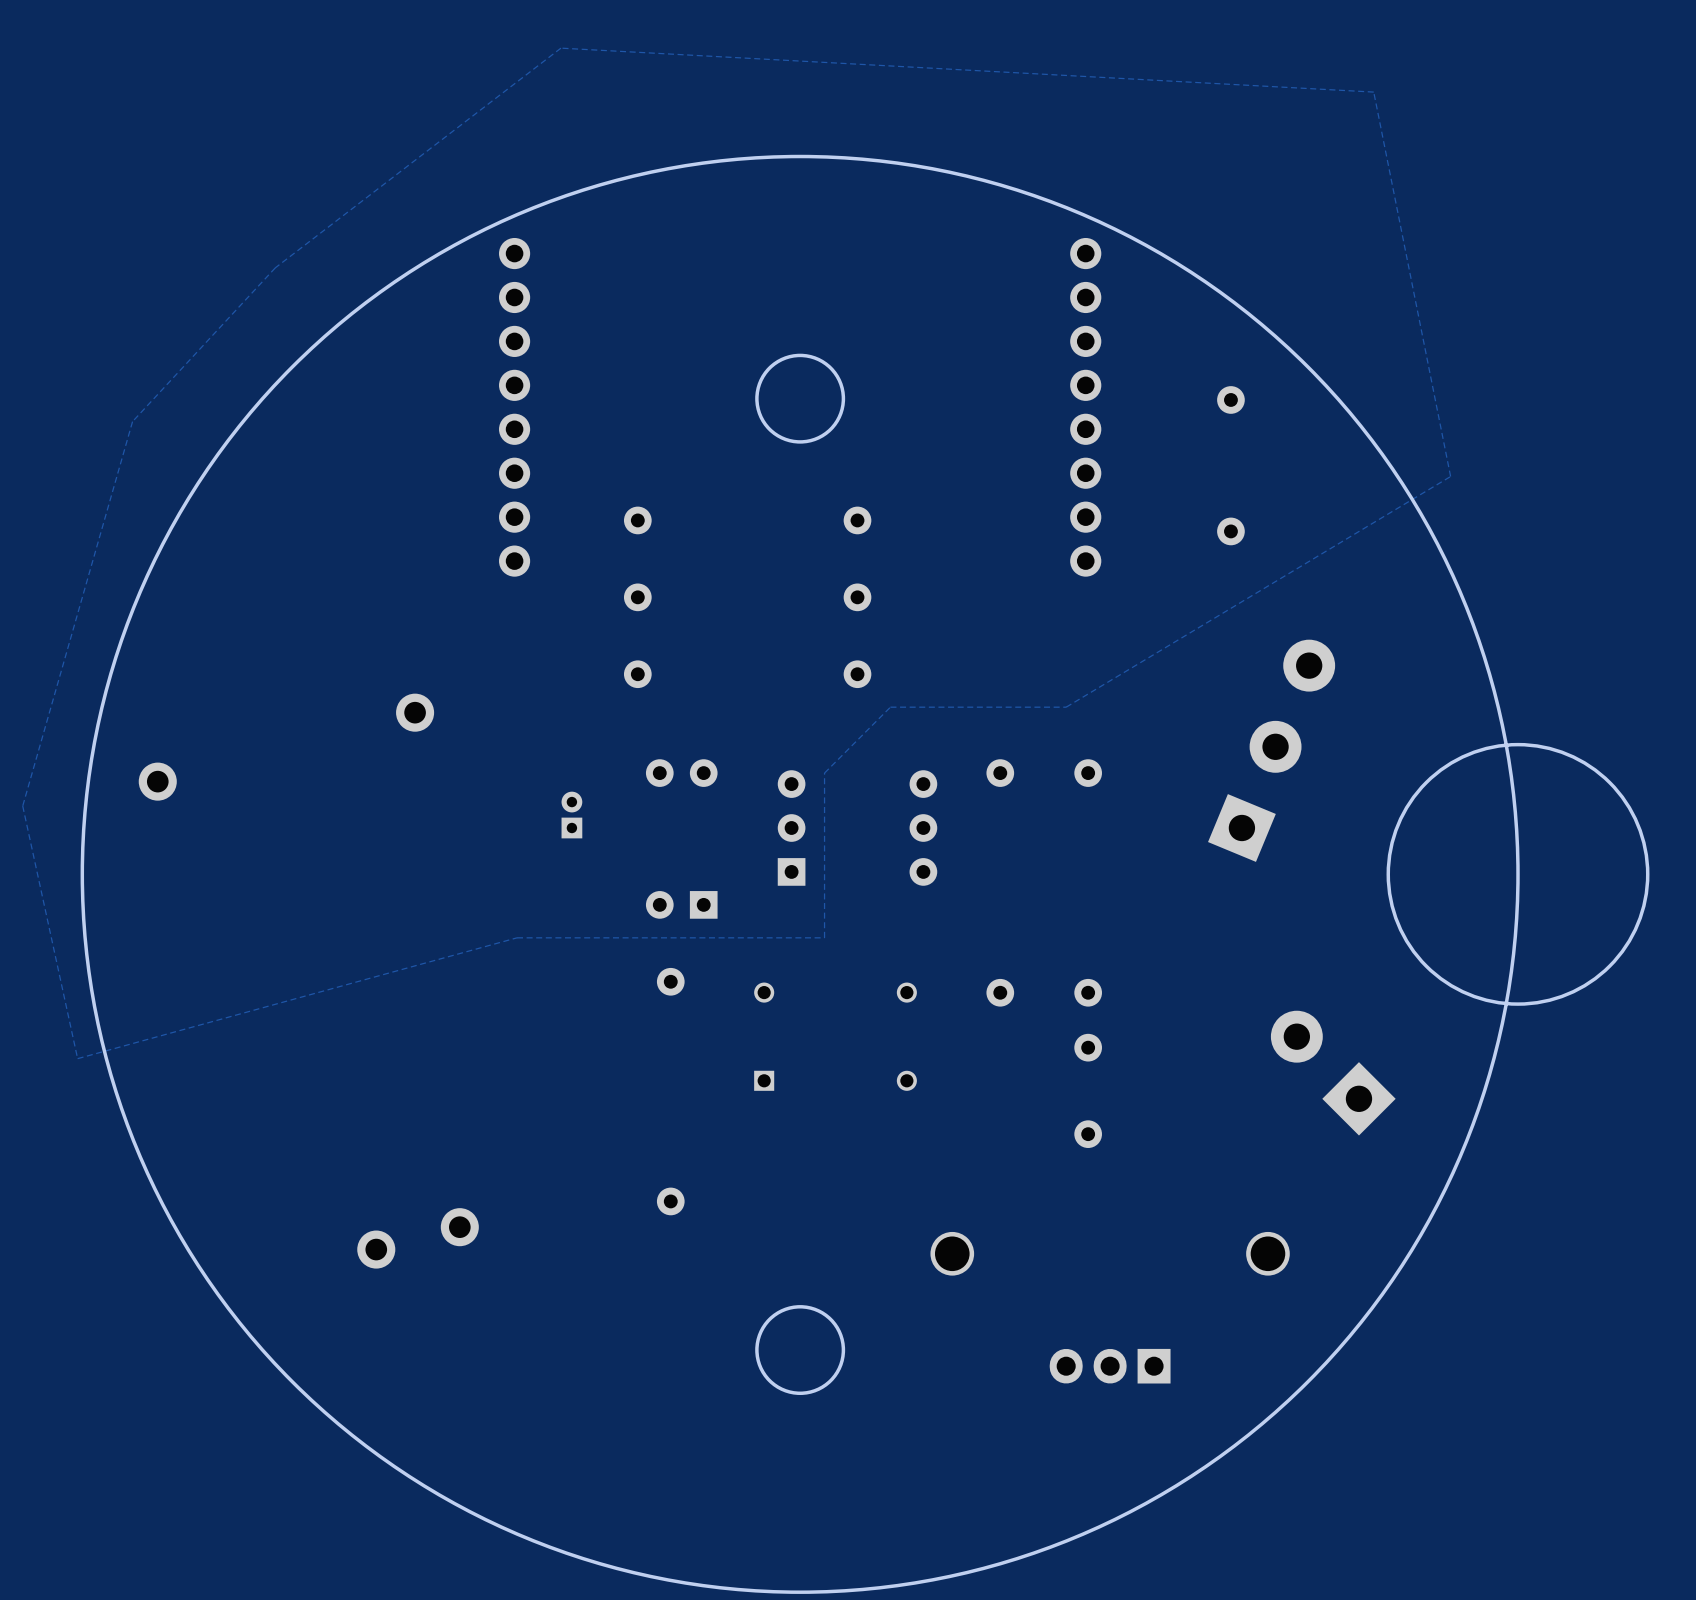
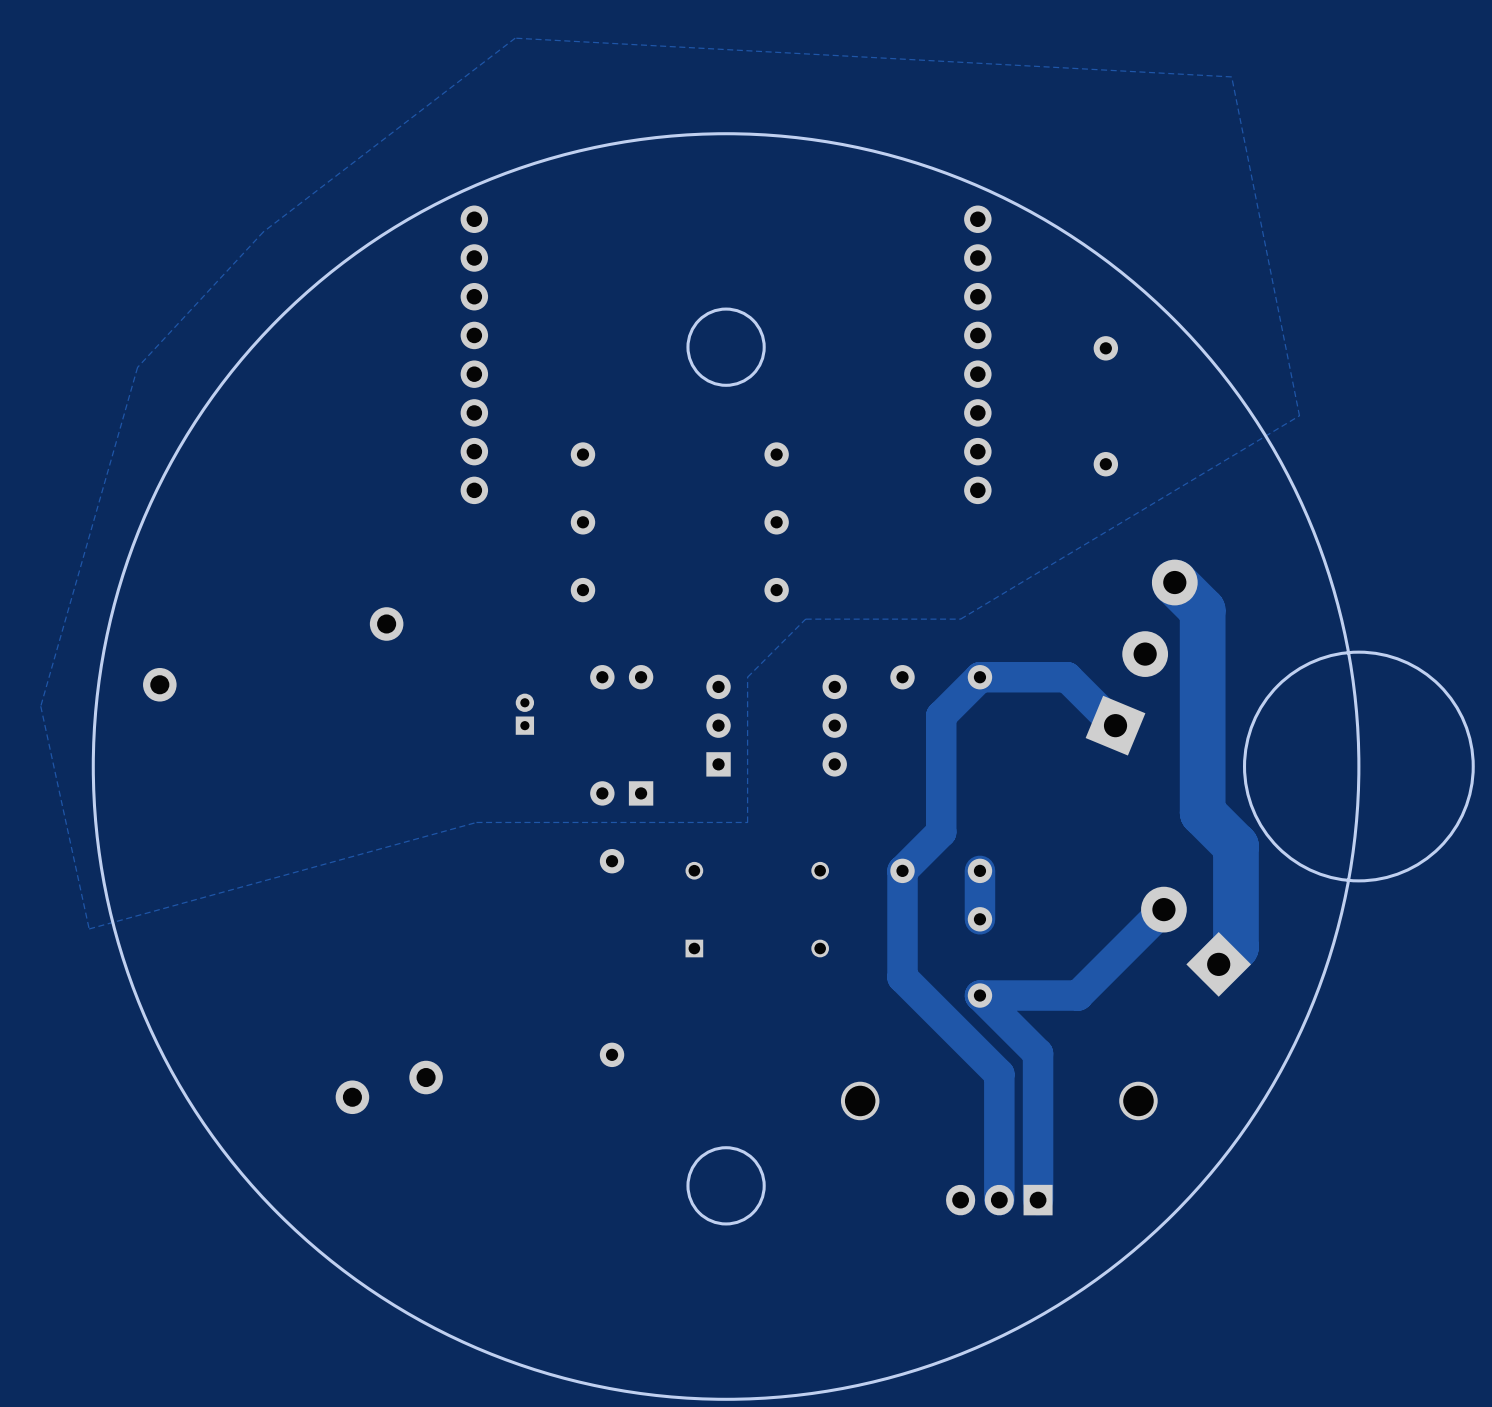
track: none -> (1174, 582) (1202, 610) (1202, 812) (1235, 846) (1235, 947) (1218, 964)
track: none -> (1115, 725) (1067, 677) (979, 677) (941, 715) (941, 832) (902, 870) (902, 977) (999, 1074) (999, 1200)
track: none -> (979, 870) (979, 919)
track: none -> (1163, 909) (1078, 995) (979, 995) (1038, 1053) (1038, 1200)

